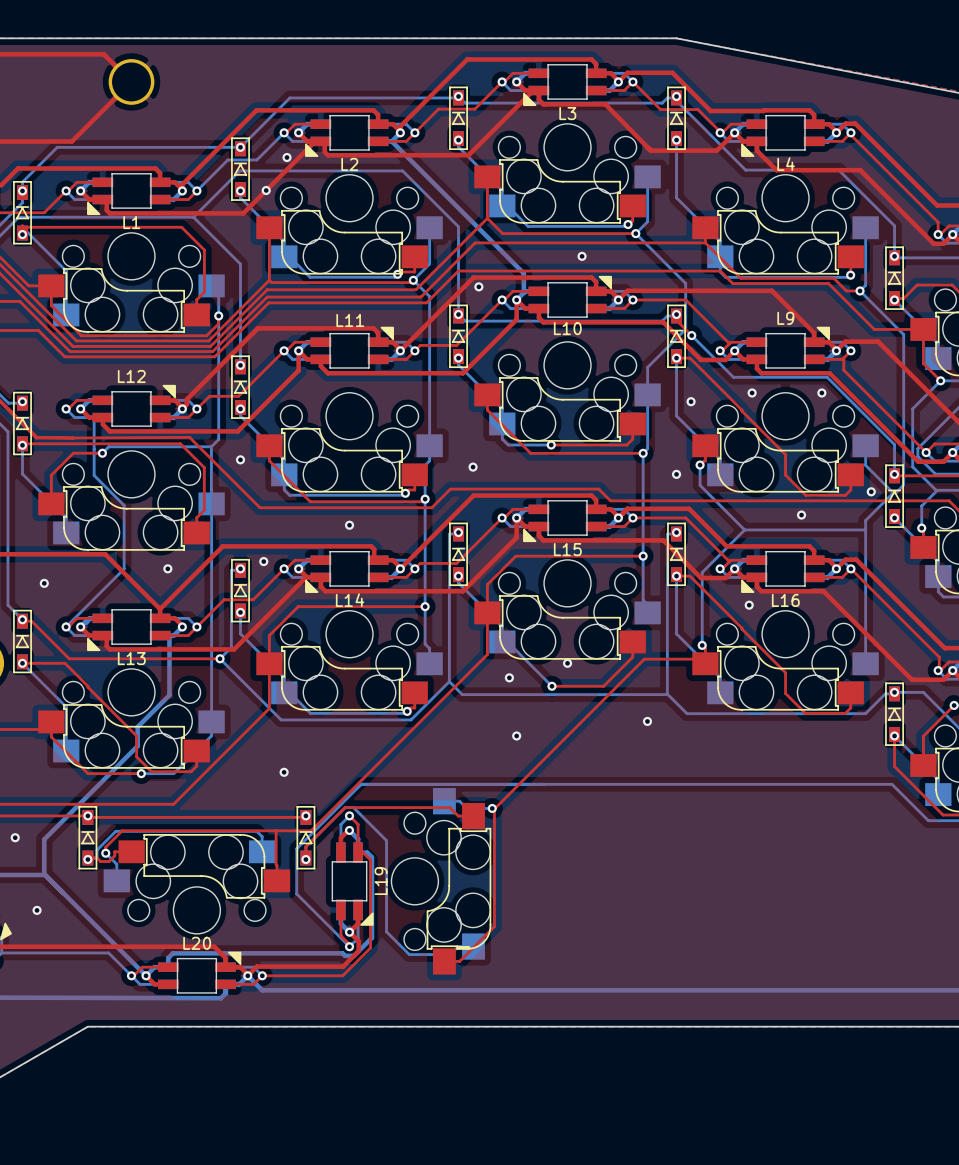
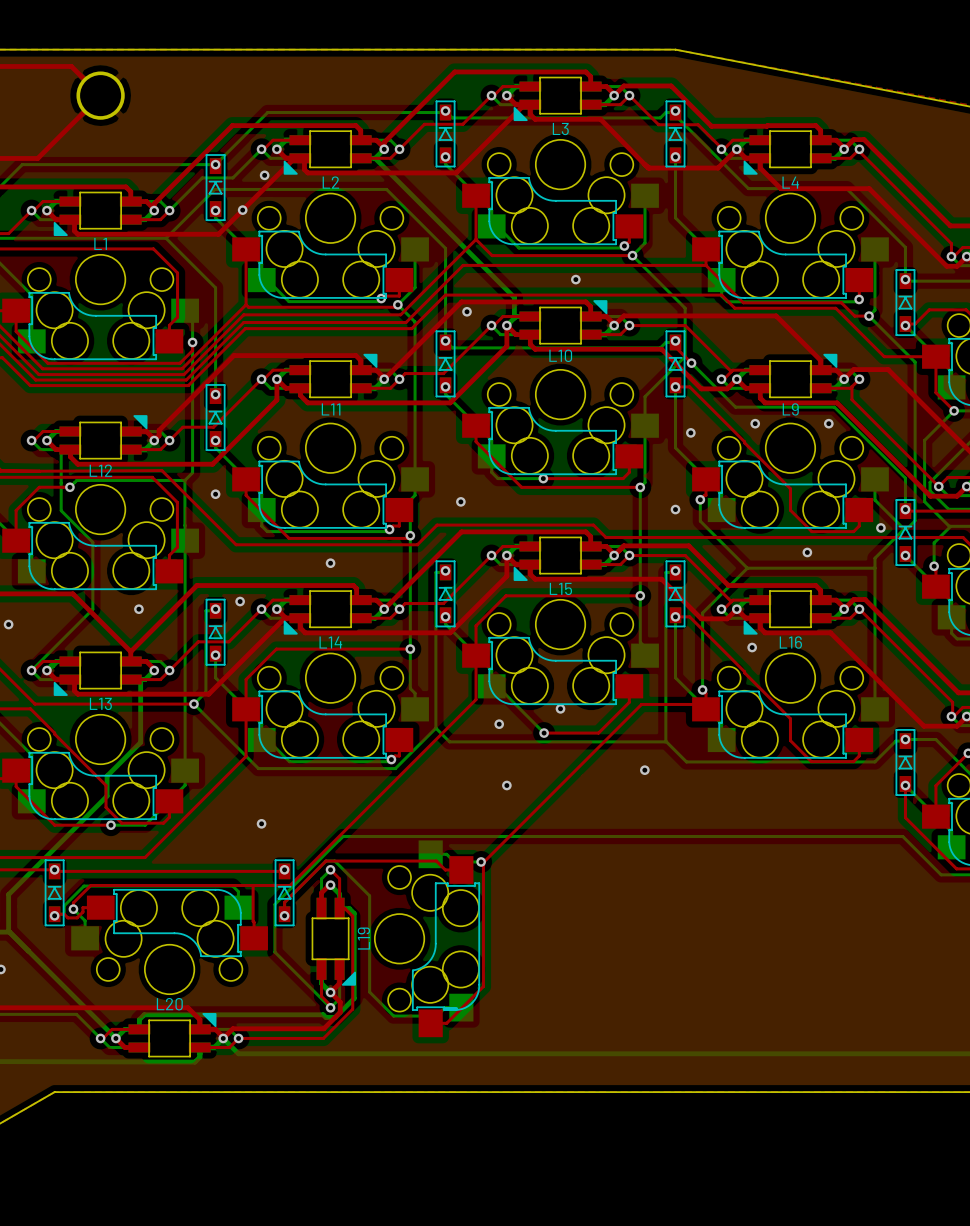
L9 name position: L9 (785, 318) -> L9 (790, 409)
L11 name position: L11 (350, 320) -> L11 (331, 409)
L12 name position: L12 (131, 376) -> L12 (100, 470)

